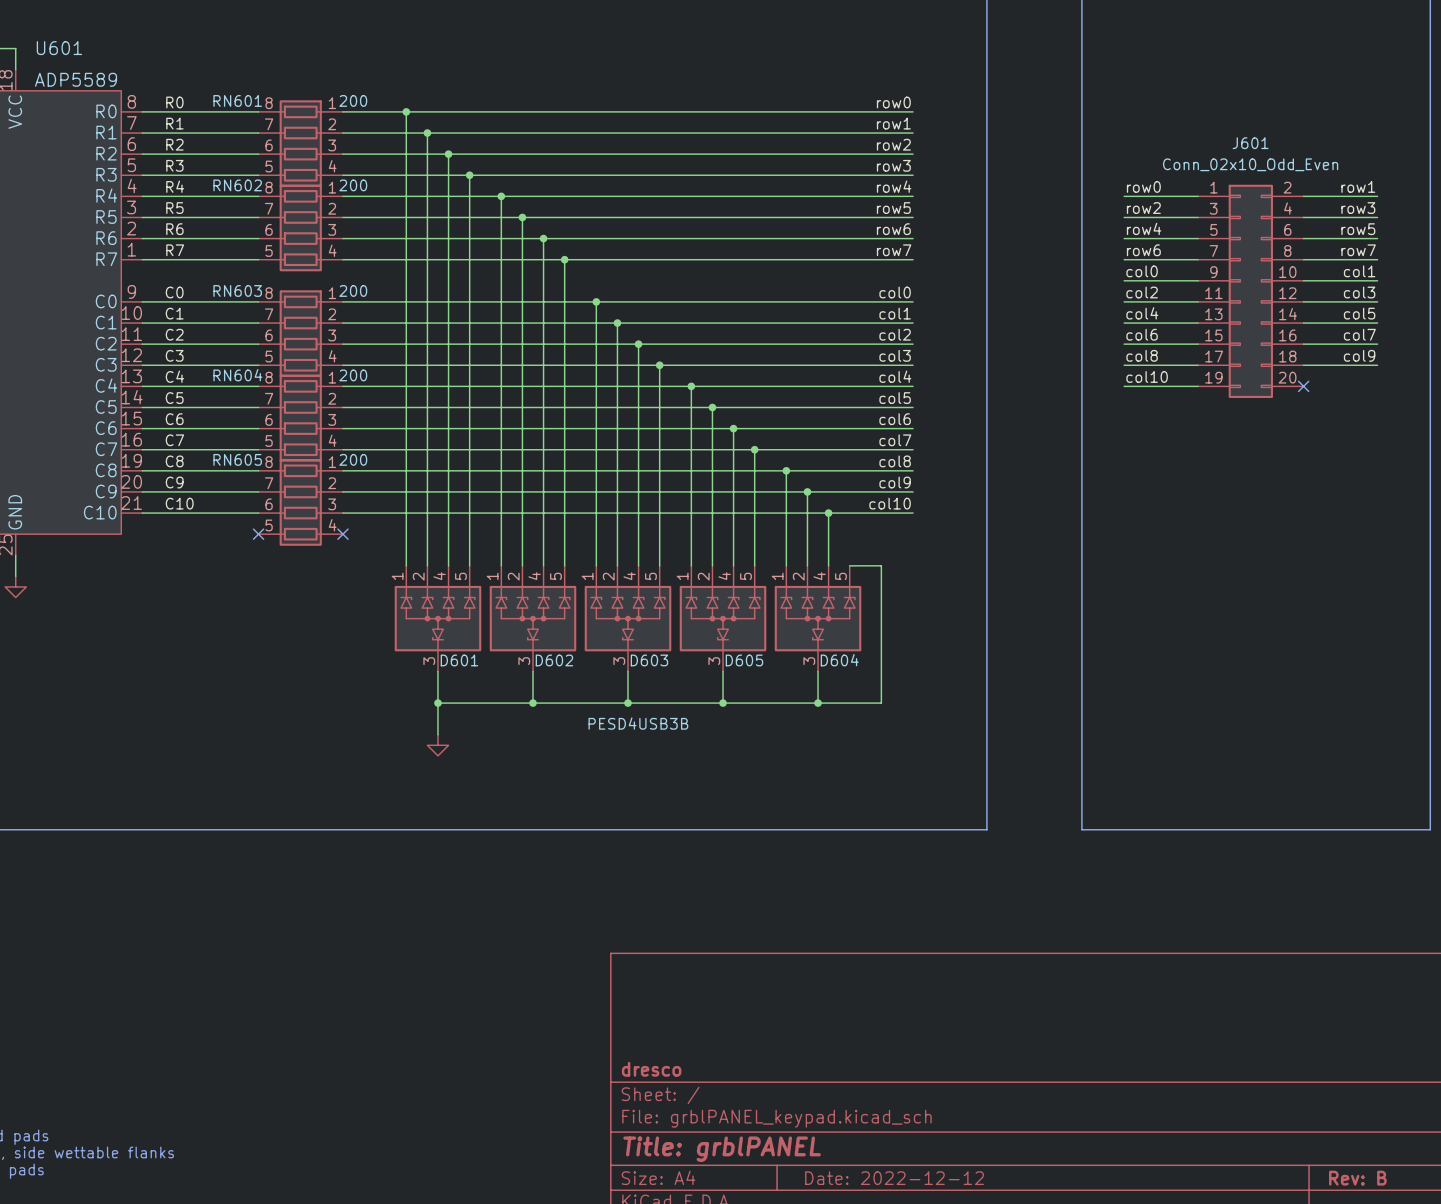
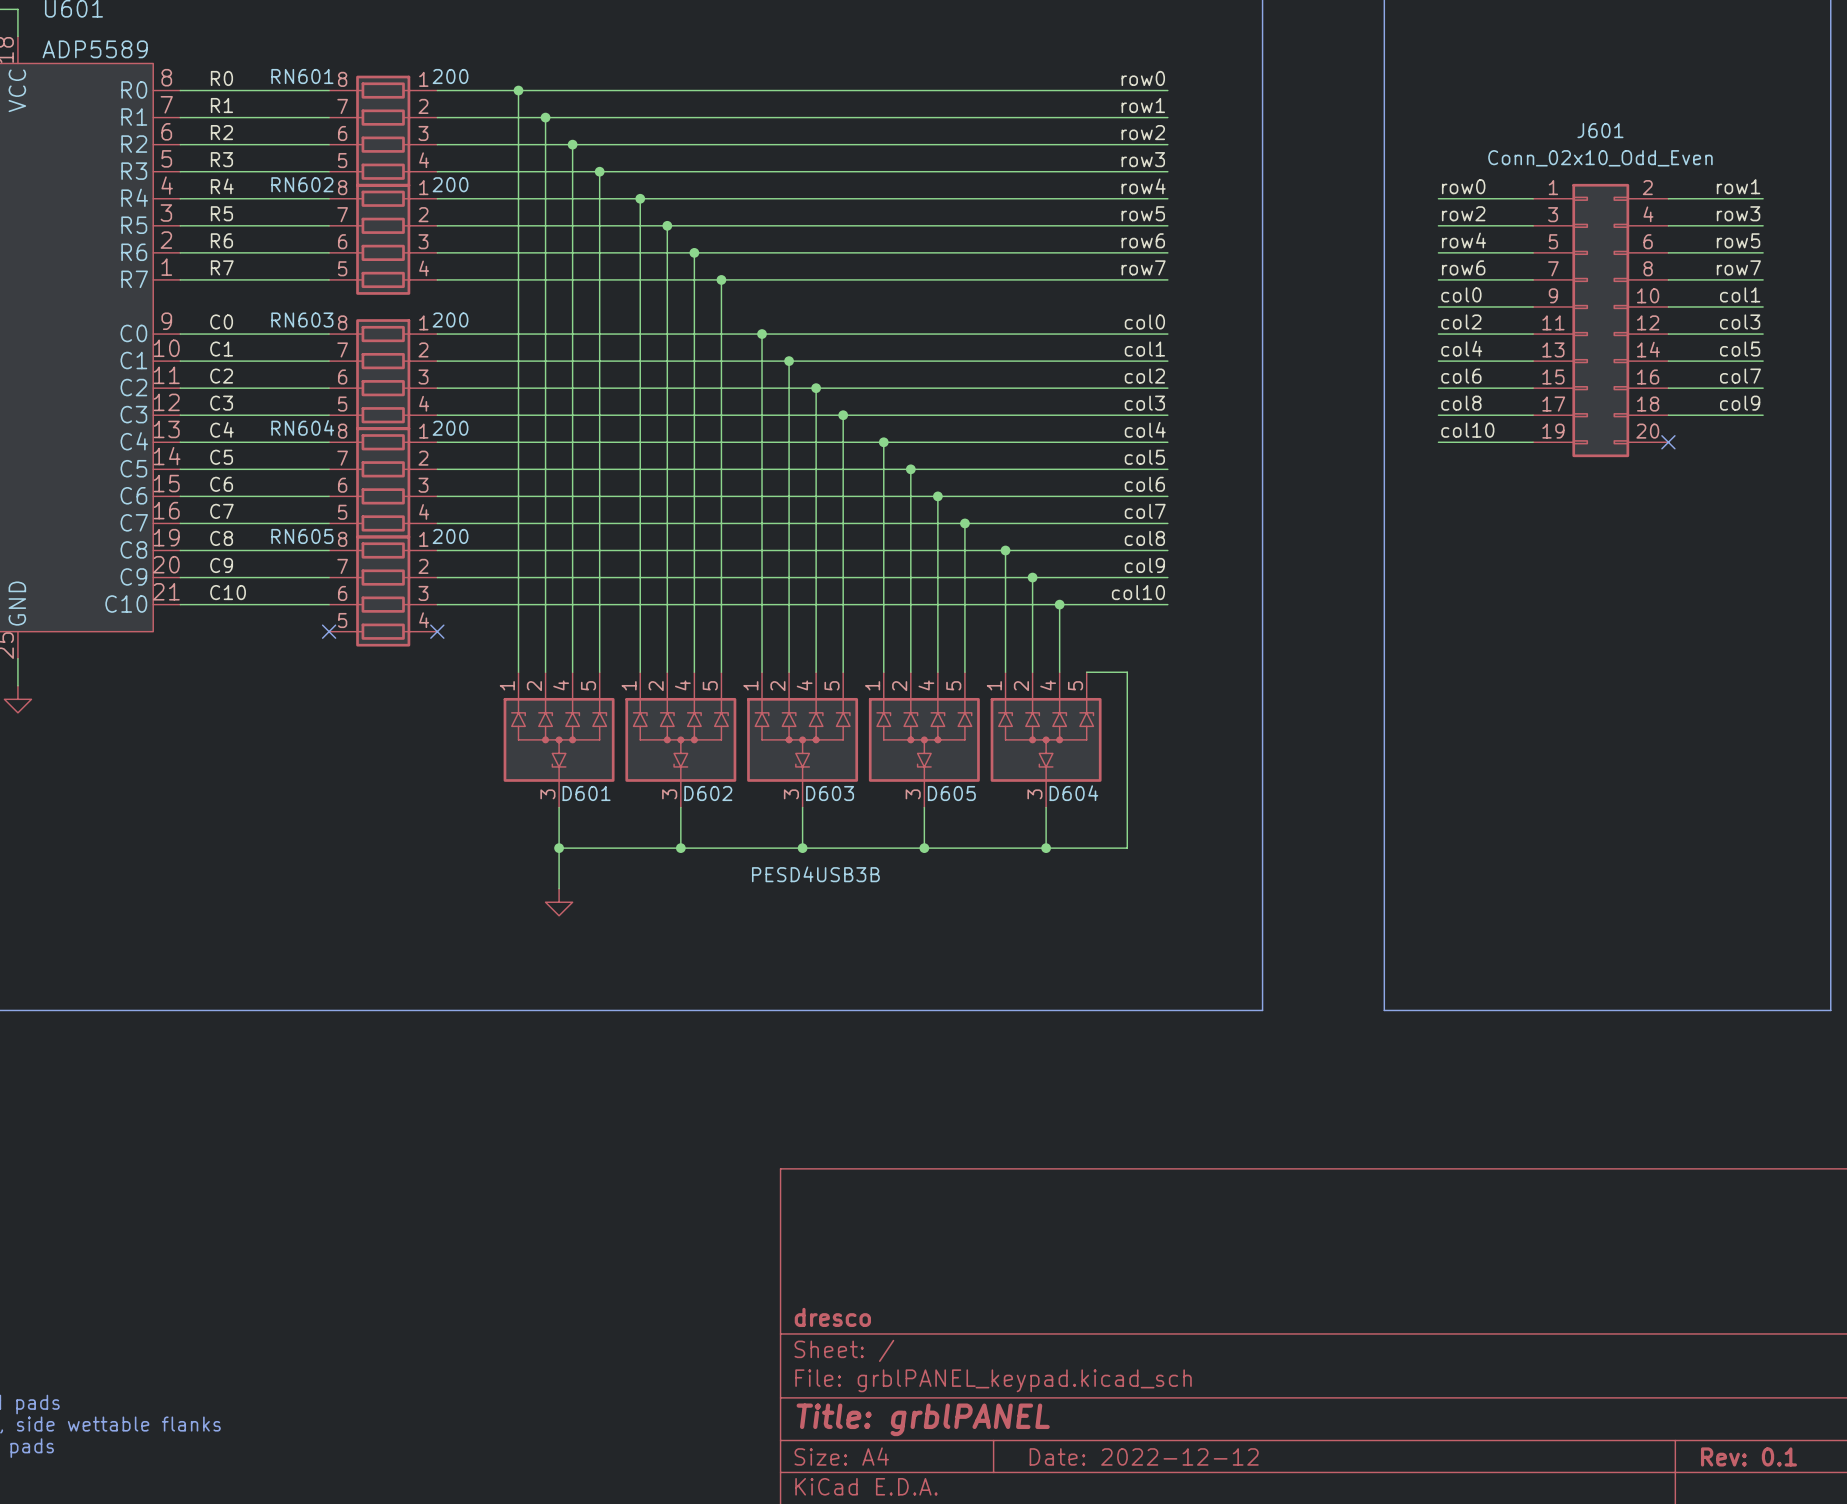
title block: Rev: B (1357, 1178) -> Rev: 0.1 (1748, 1456)

